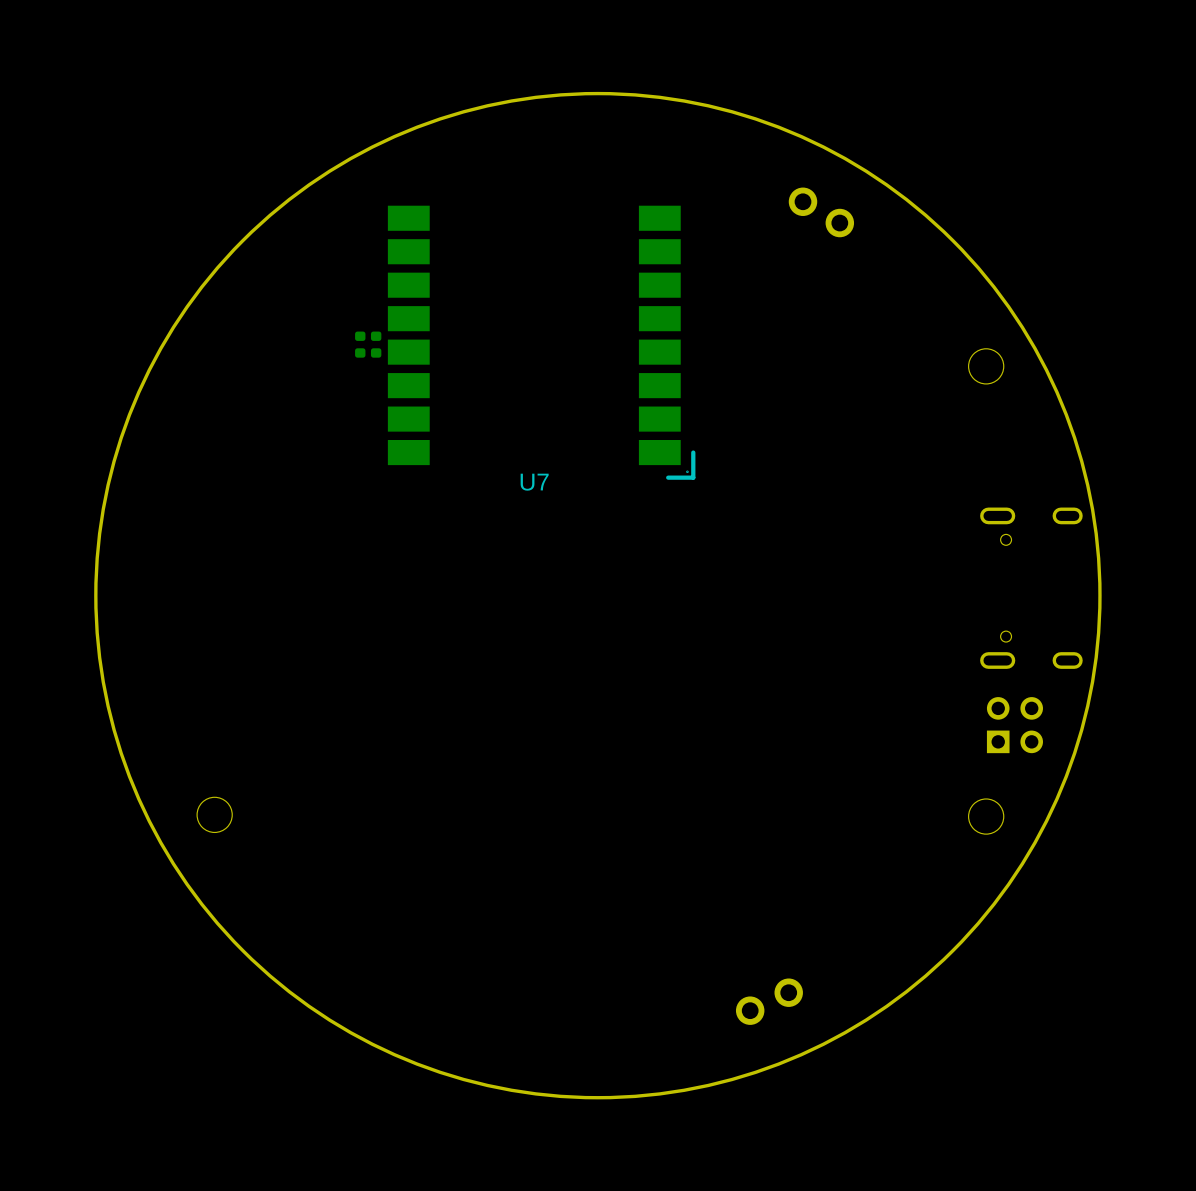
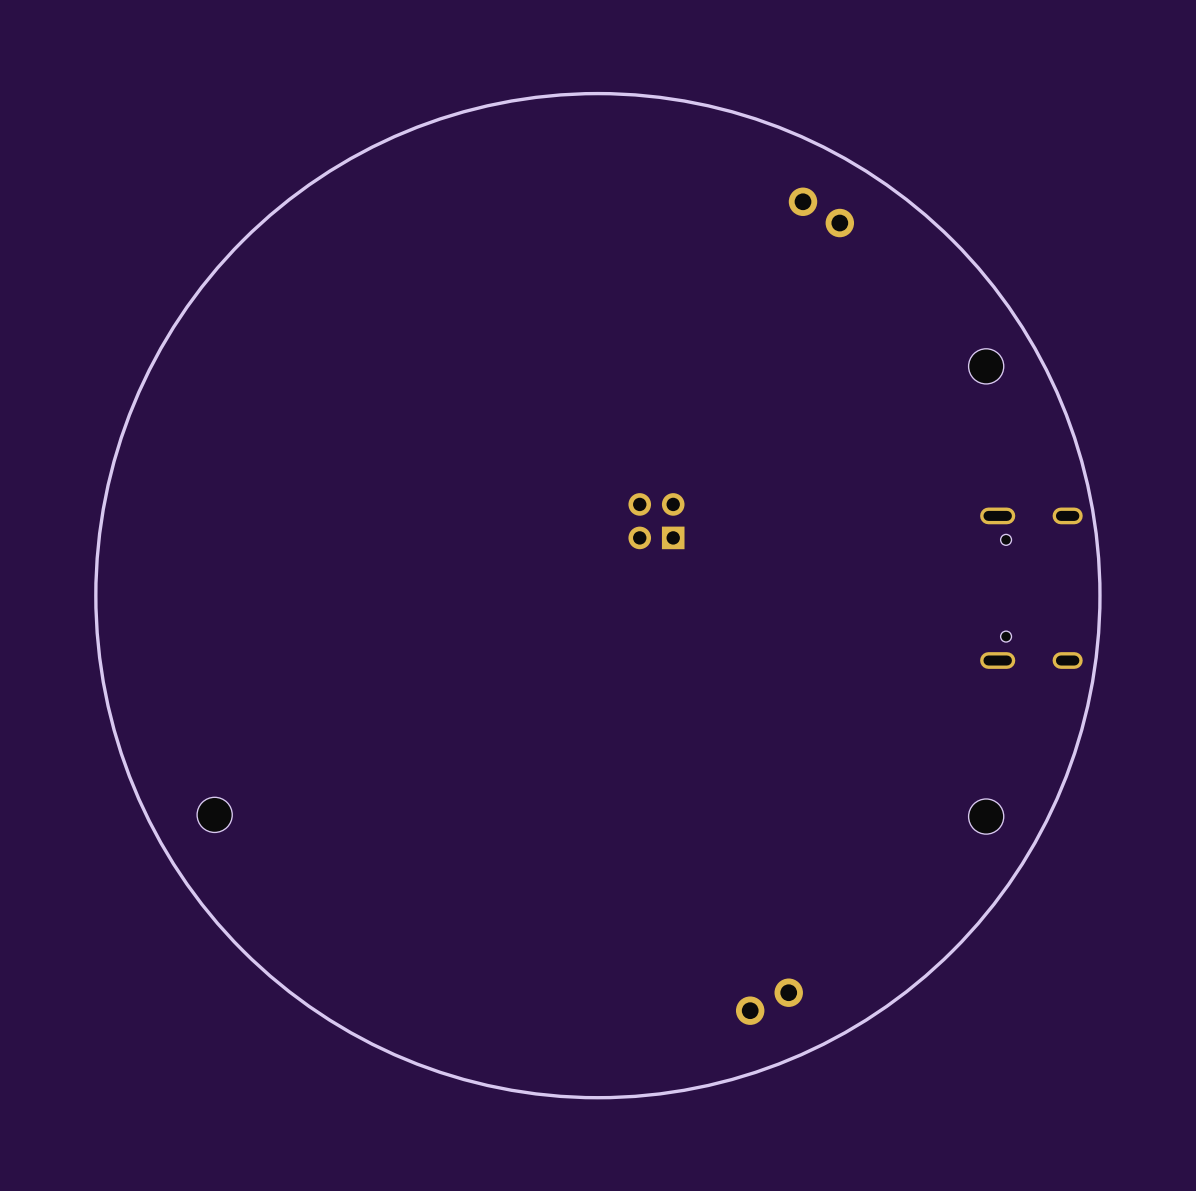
U7: (541, 342) -> none
part: (360, 344) -> none
part: (376, 344) -> none
part rotation: 0° (1014, 725) -> 90° counterclockwise (656, 521)
part position: (1014, 725) -> (656, 521)

